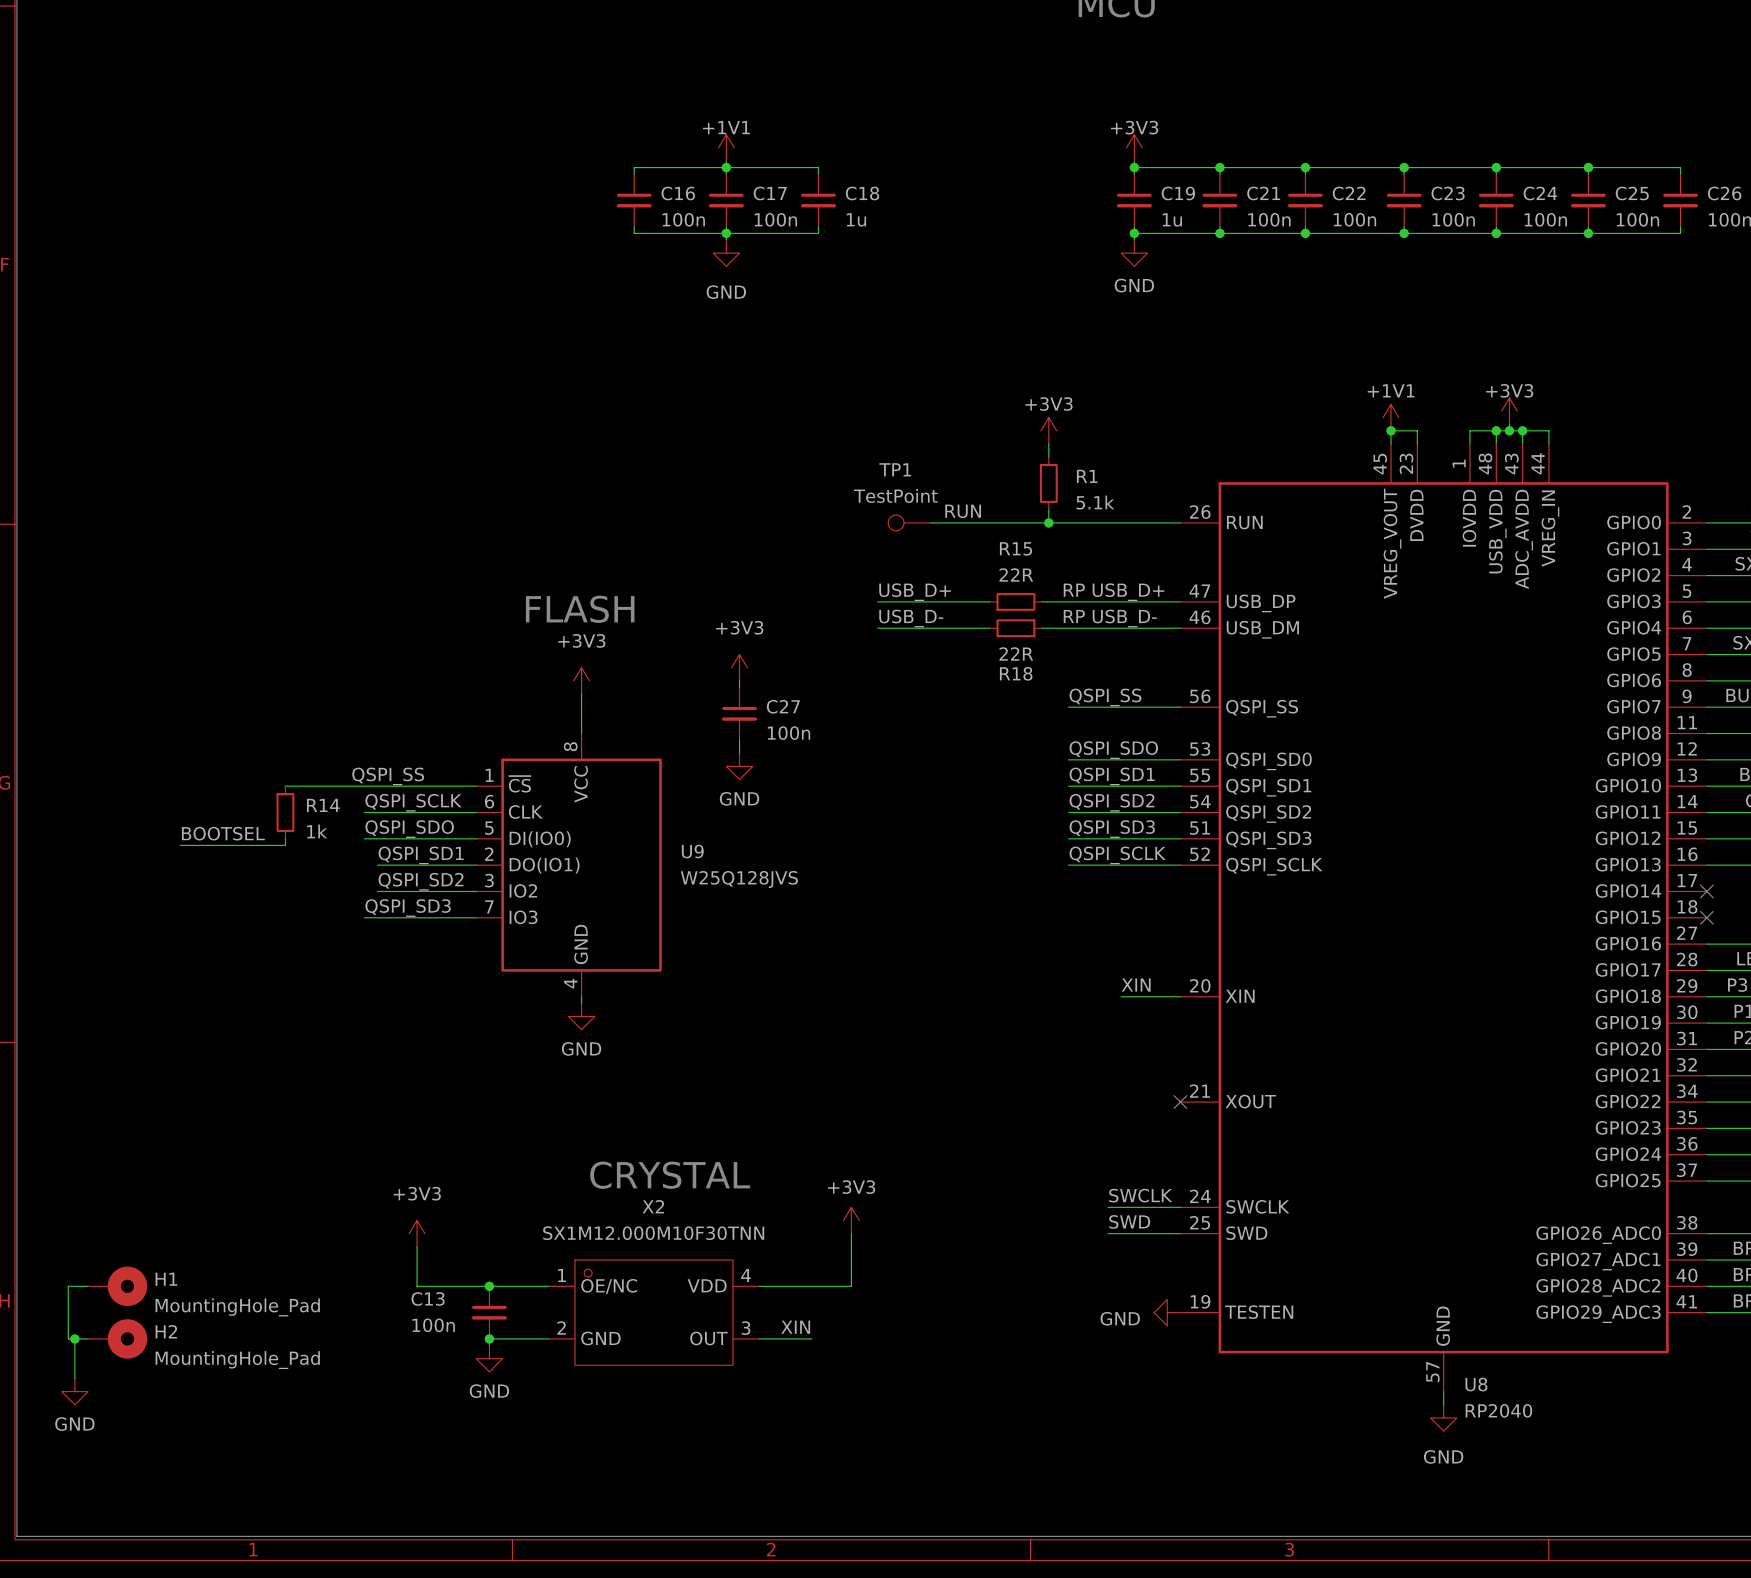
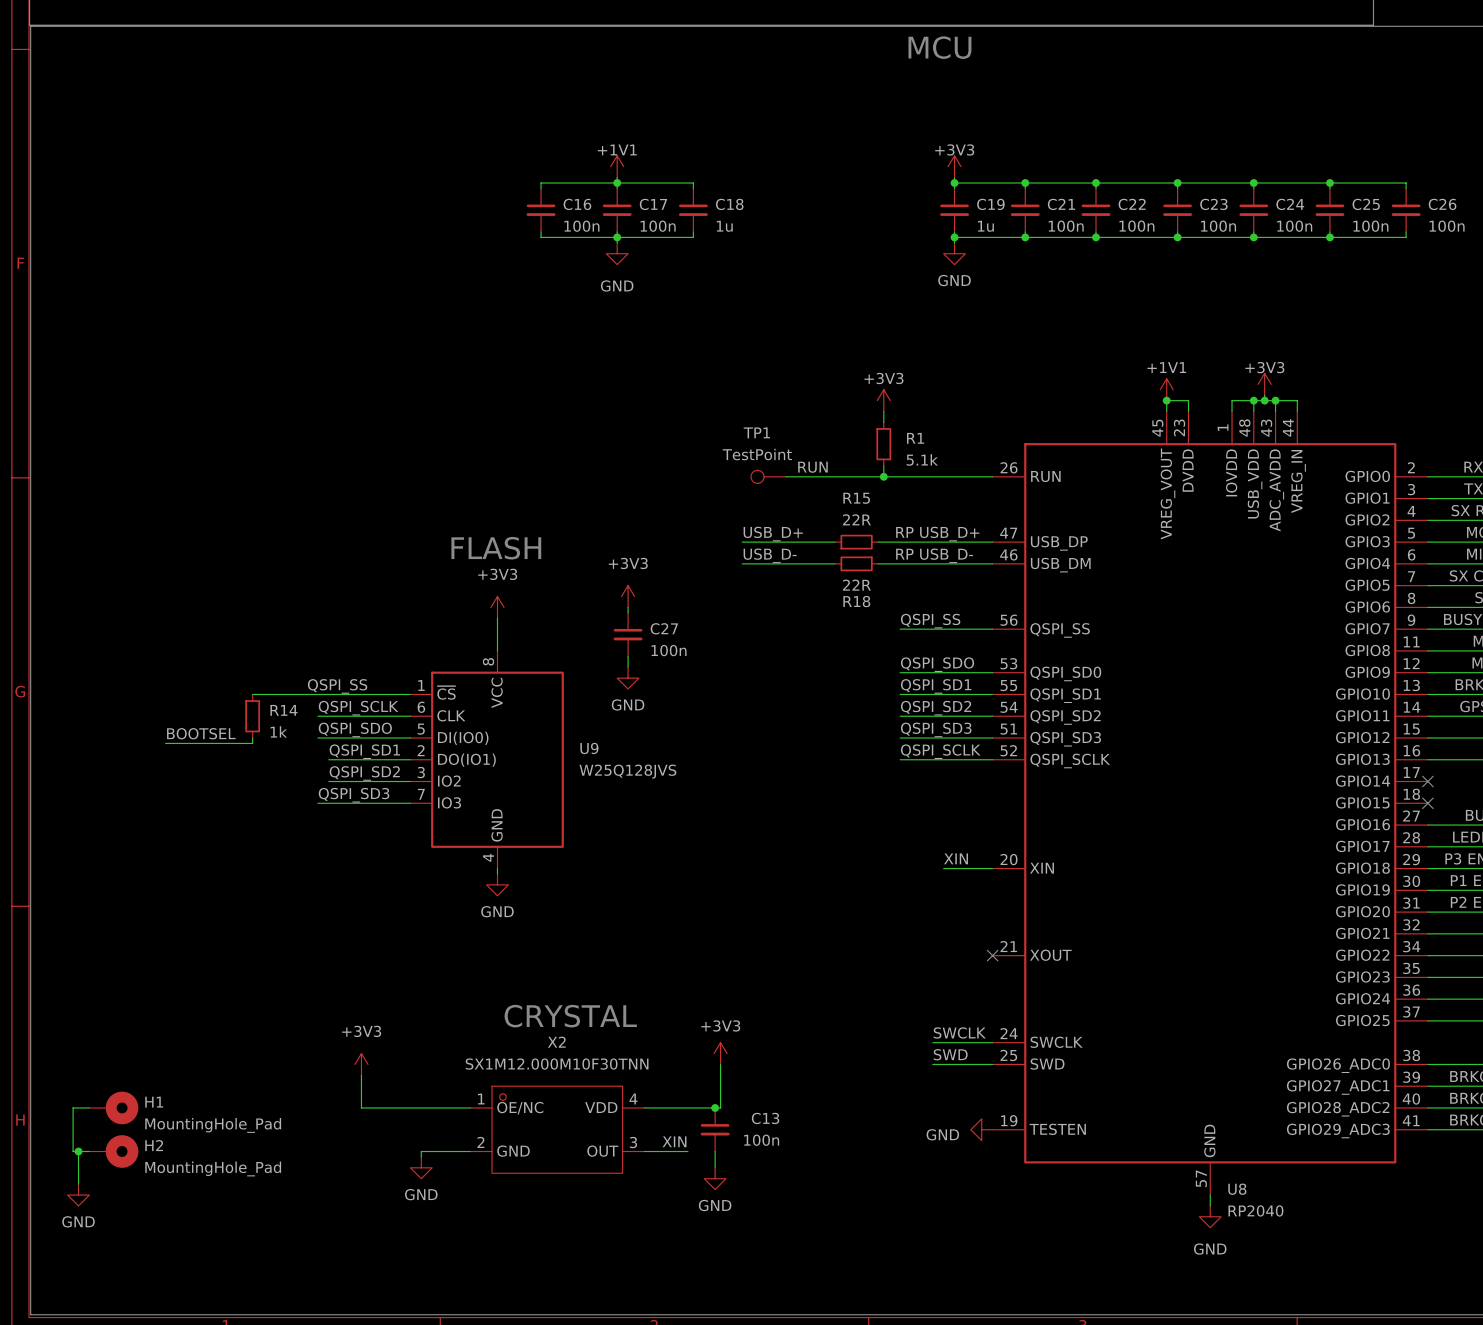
junction: (489, 1286) -> none
junction: none -> (715, 1107)
C13 name position: C13 (428, 1298) -> C13 (765, 1118)
C13 position: (489, 1312) -> (715, 1129)
C13 value position: 100n (433, 1325) -> 100n (761, 1140)
junction: (489, 1338) -> none
wire: none -> (715, 1151) (715, 1167)
power symbol: none -> GND (715, 1178)

